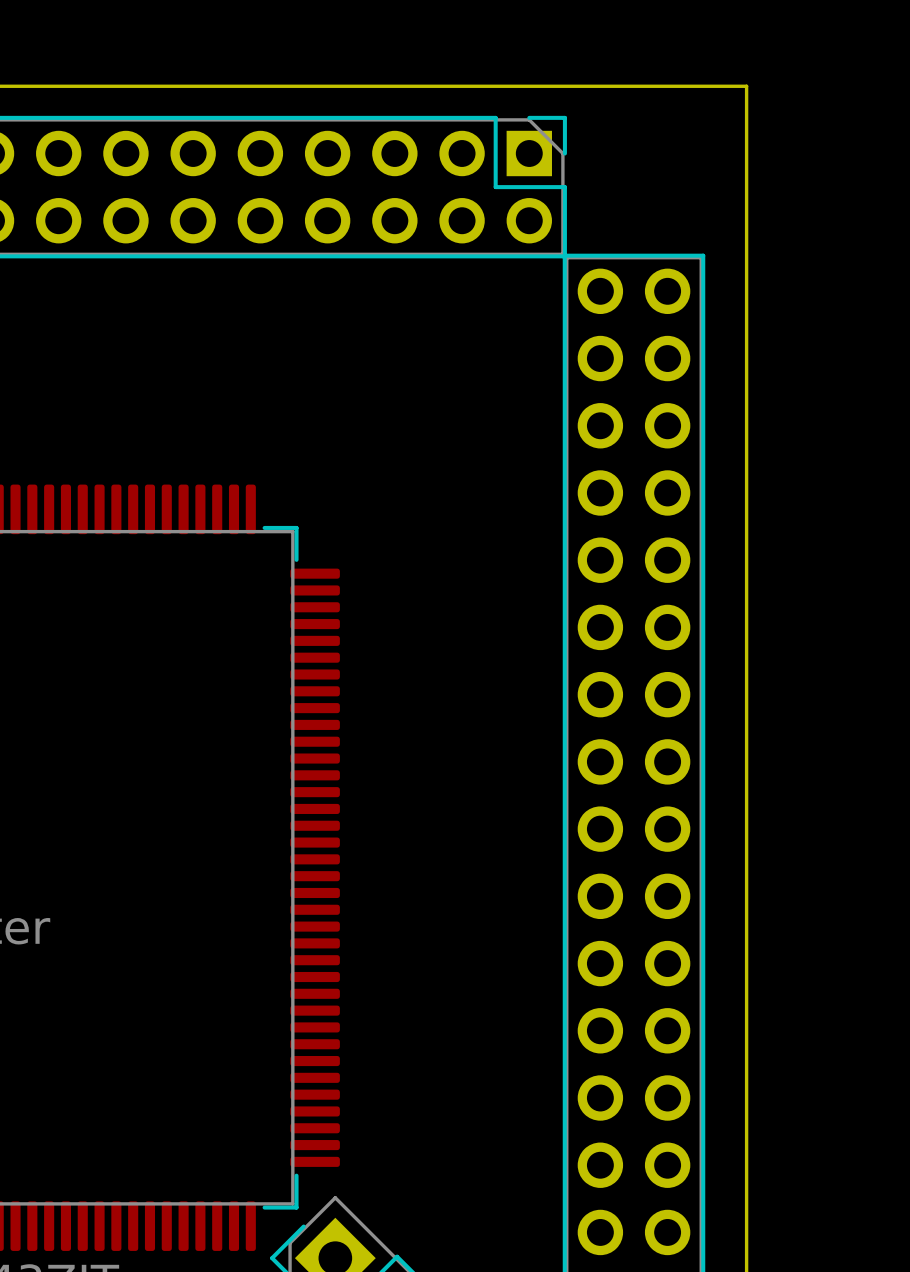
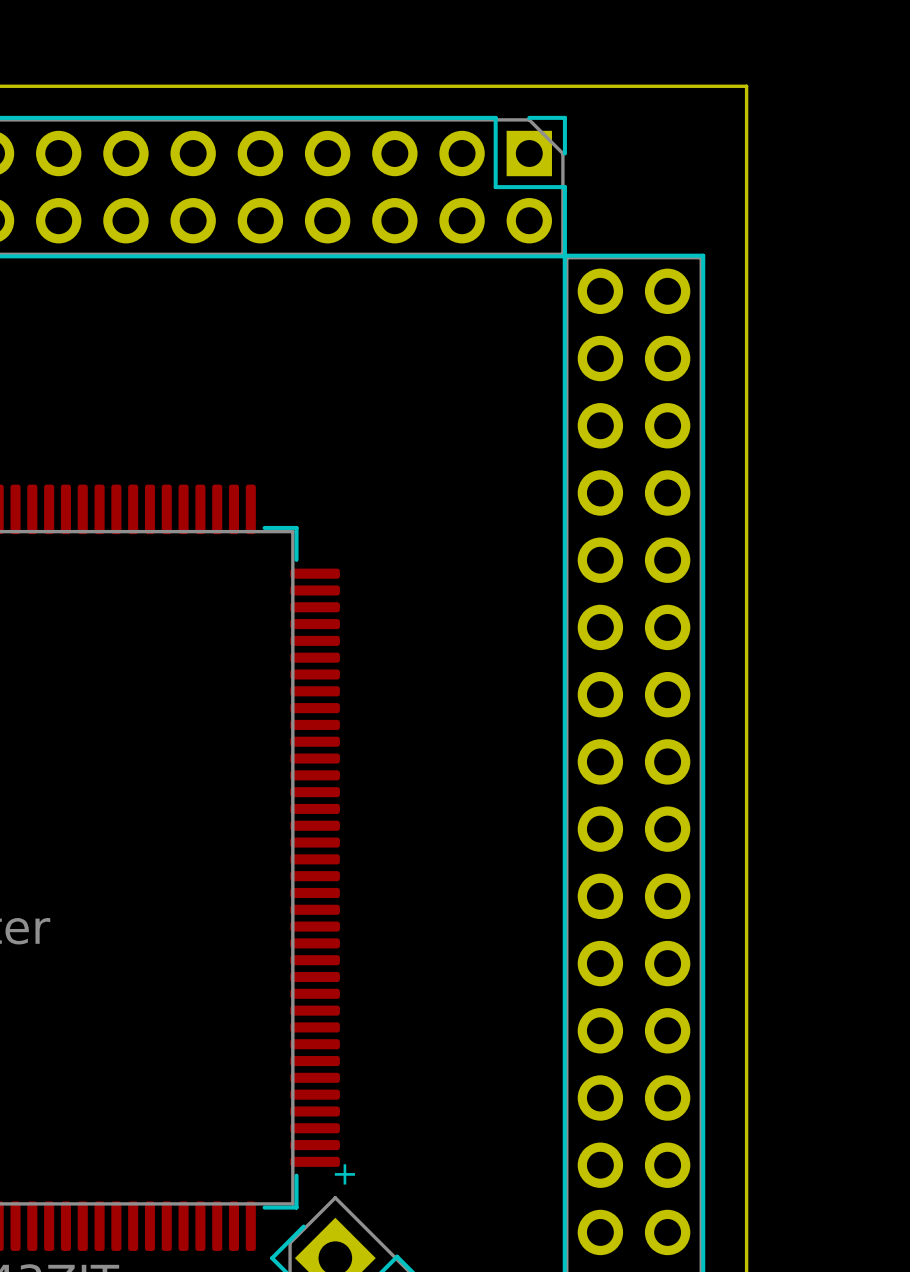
text: none -> + (344, 1174)

